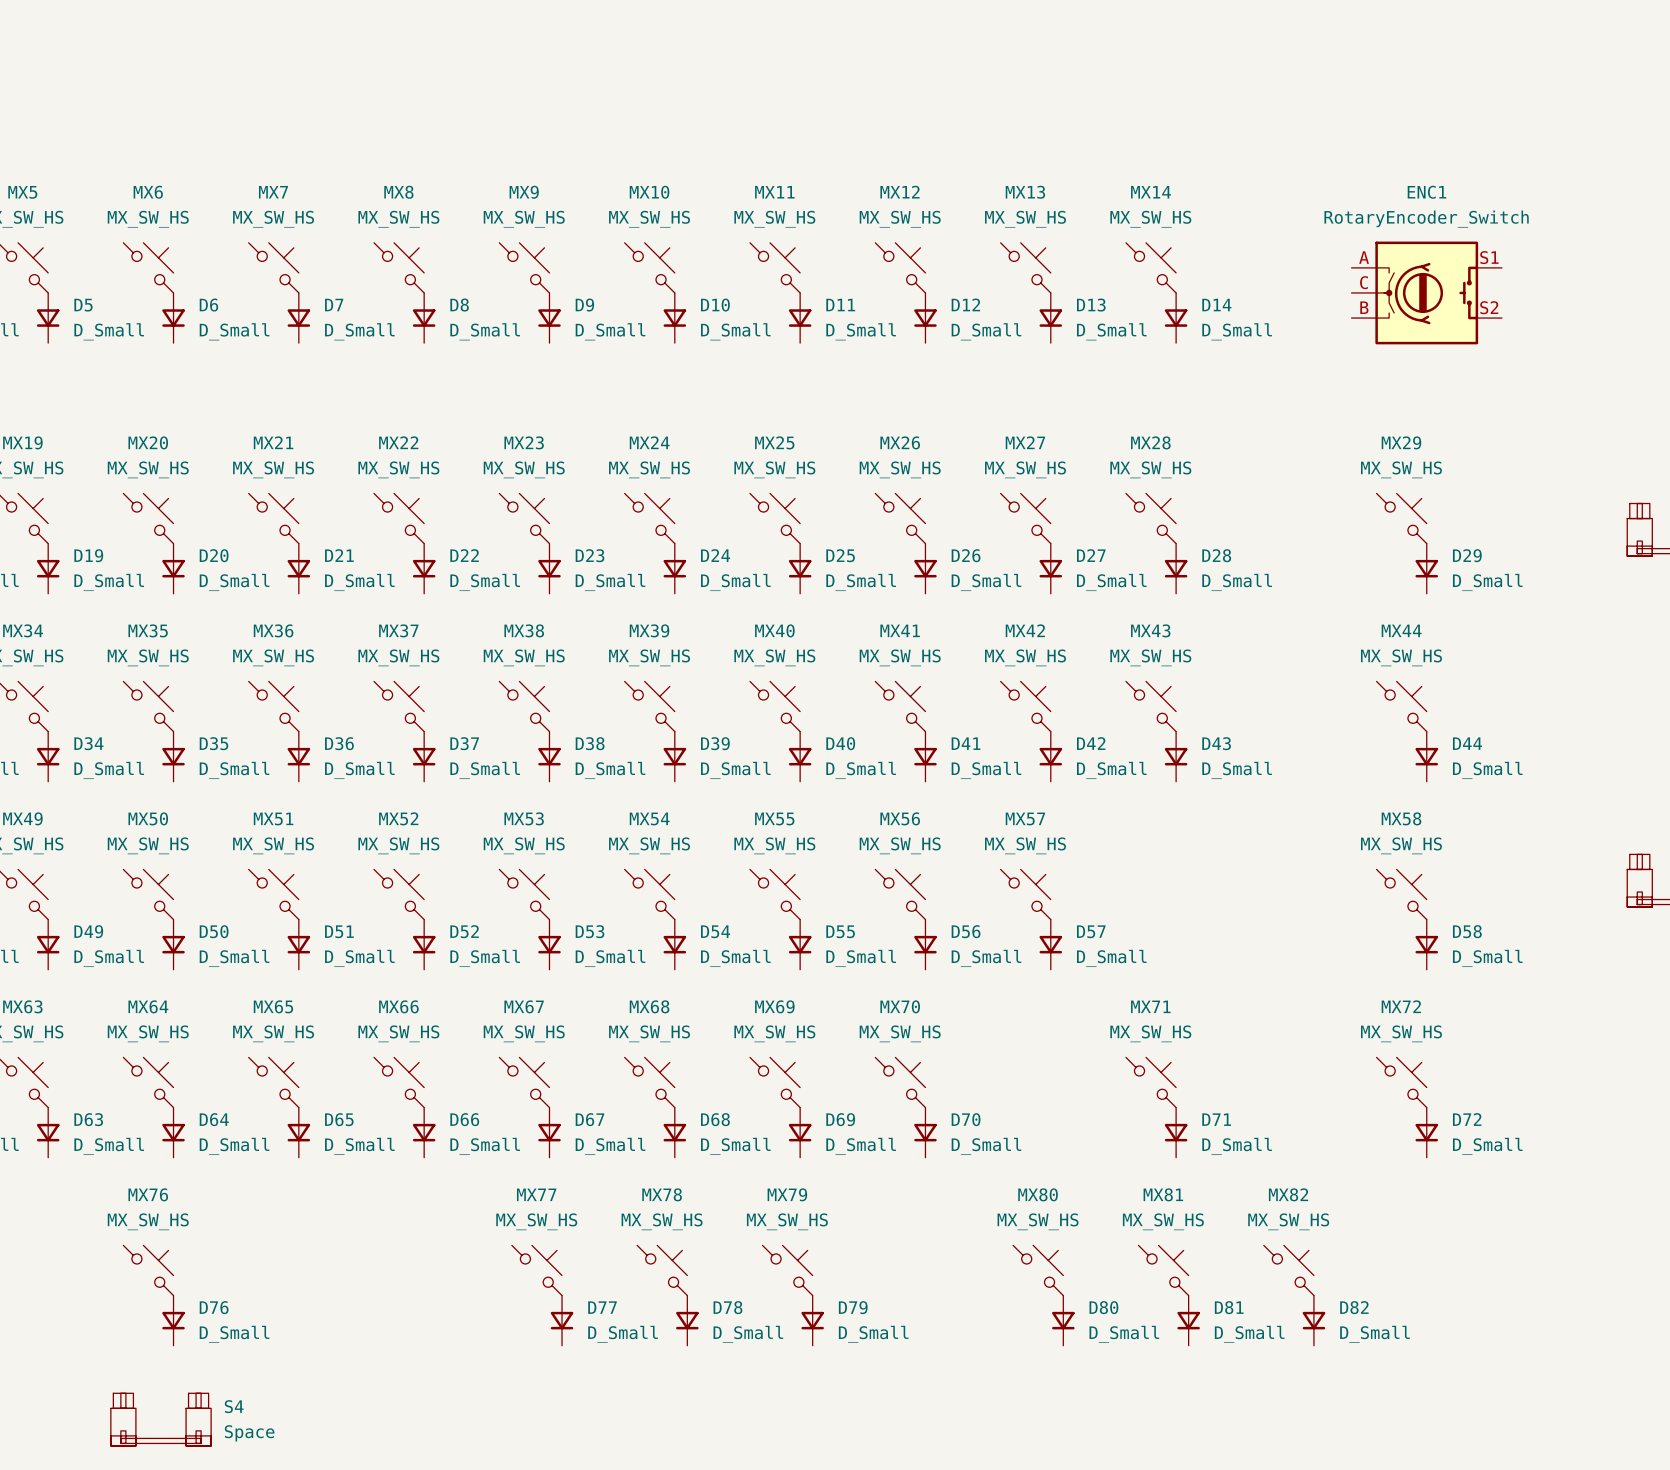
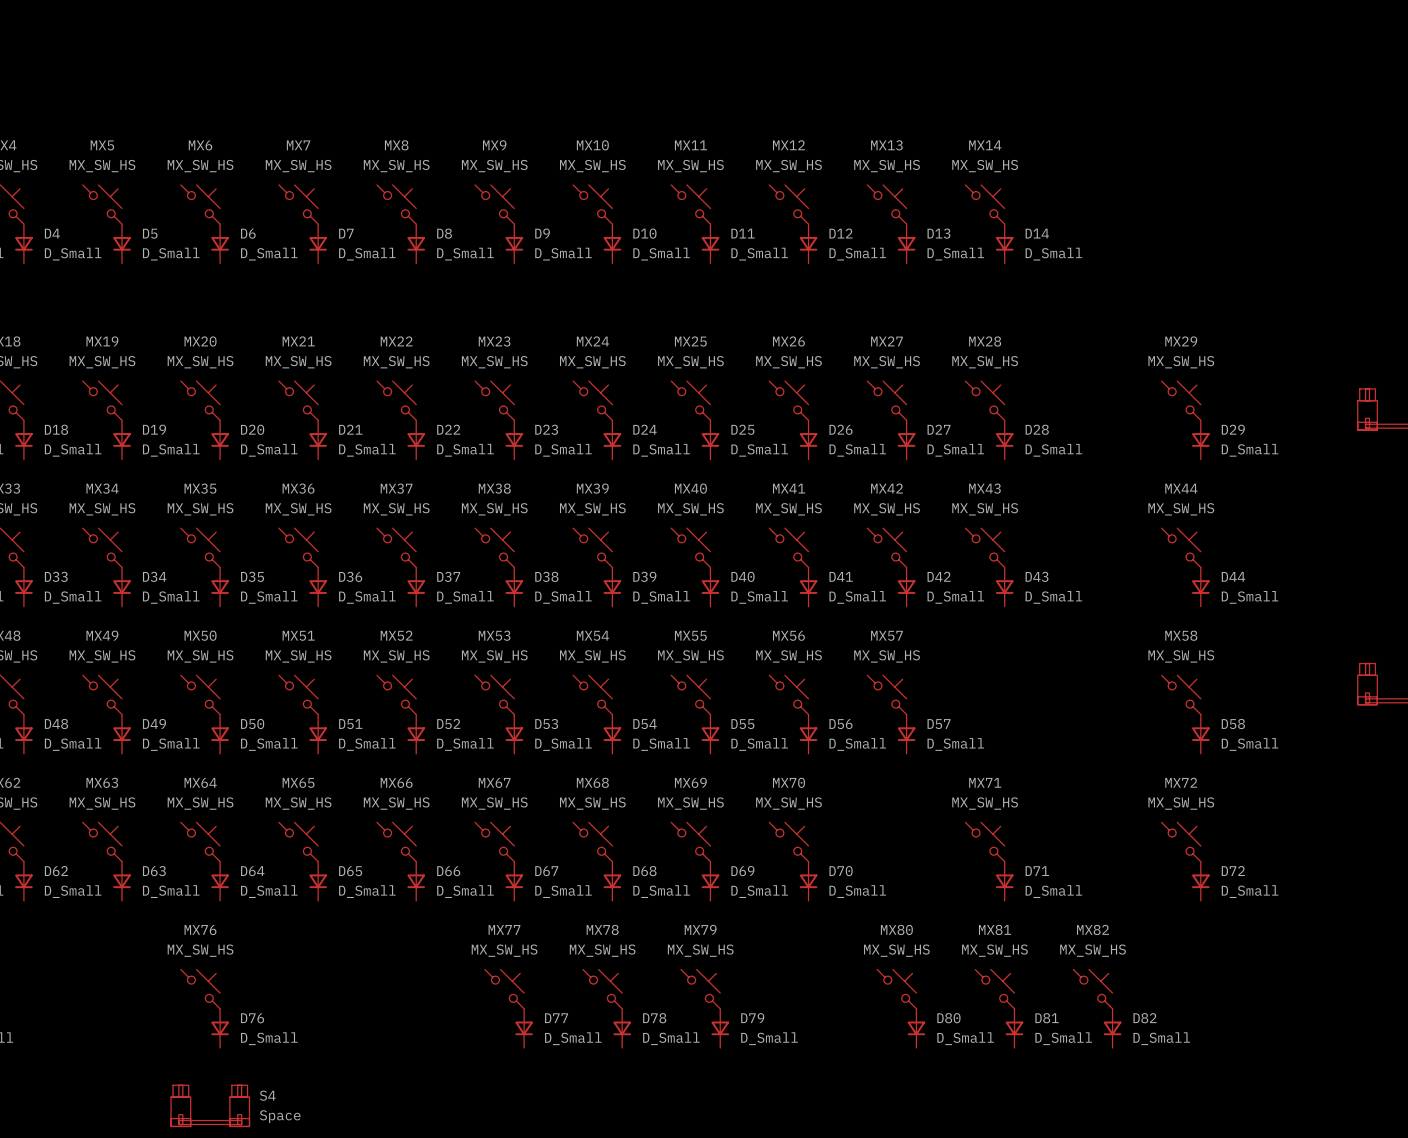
ENC1: RotaryEncoder_Switch (1426, 292) -> none

